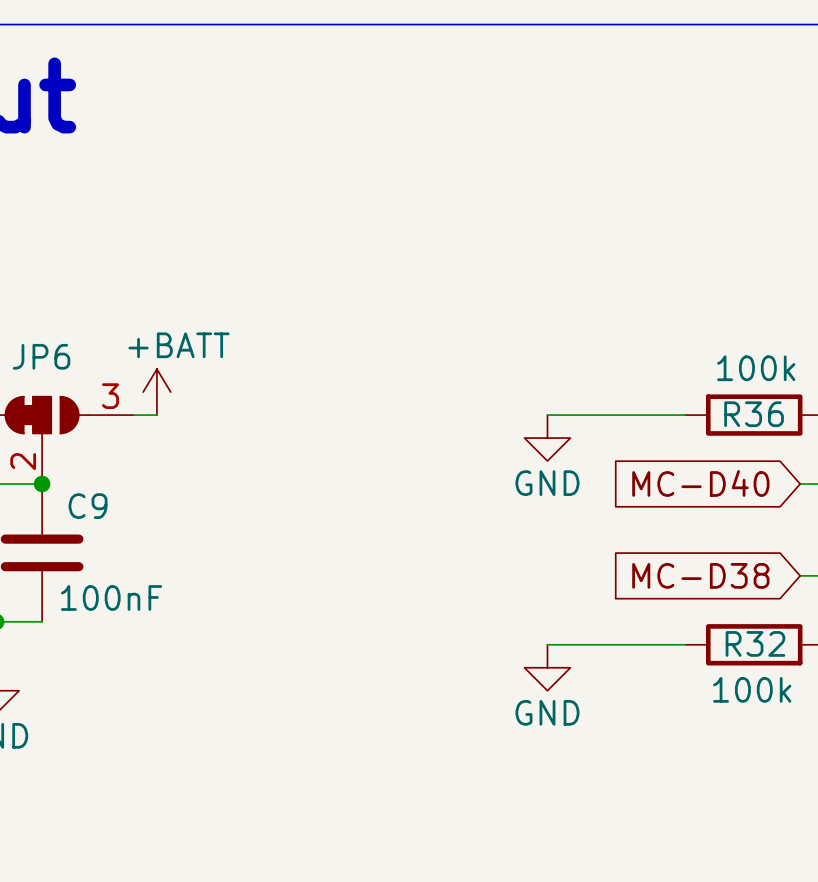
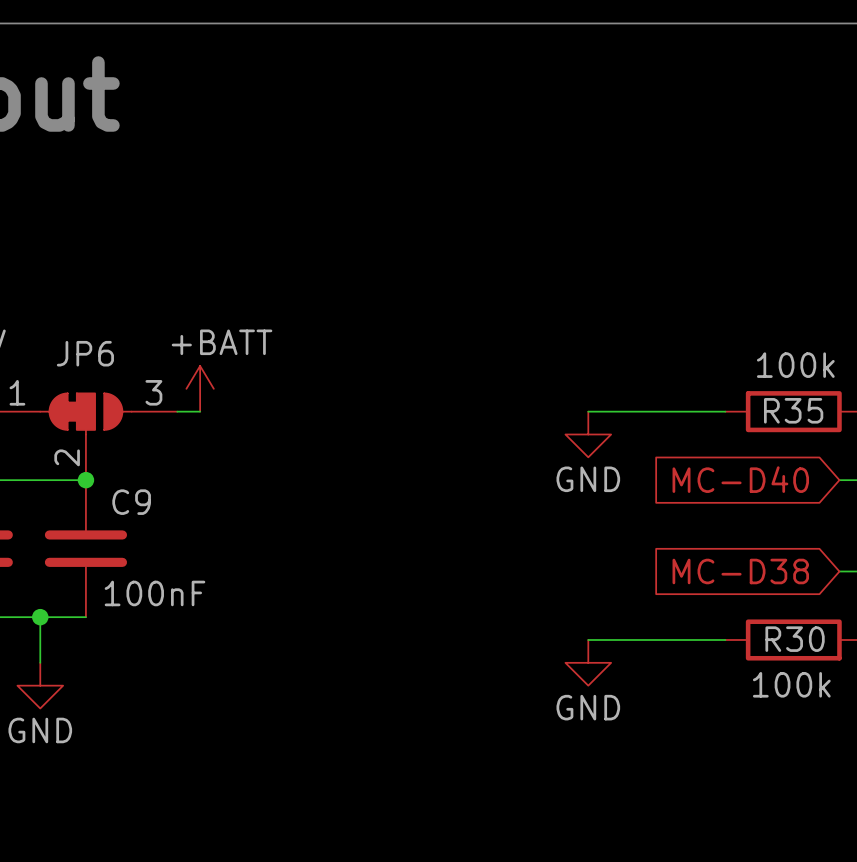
R36 name: R36 (754, 414) -> R35 (793, 410)
R32 name: R32 (755, 643) -> R30 (795, 639)

